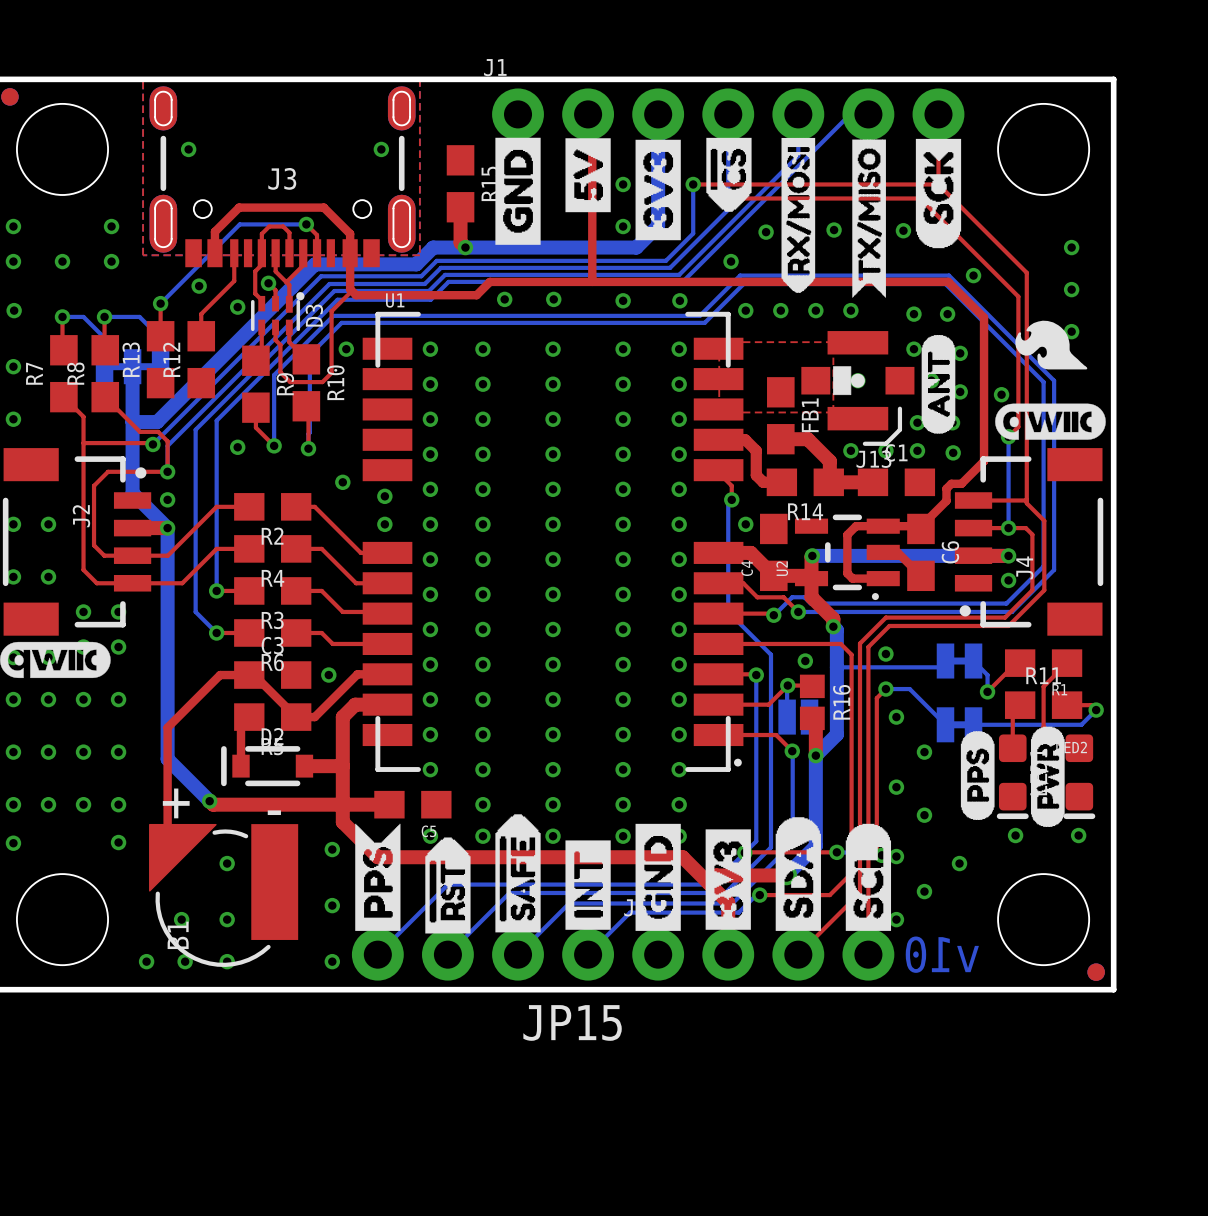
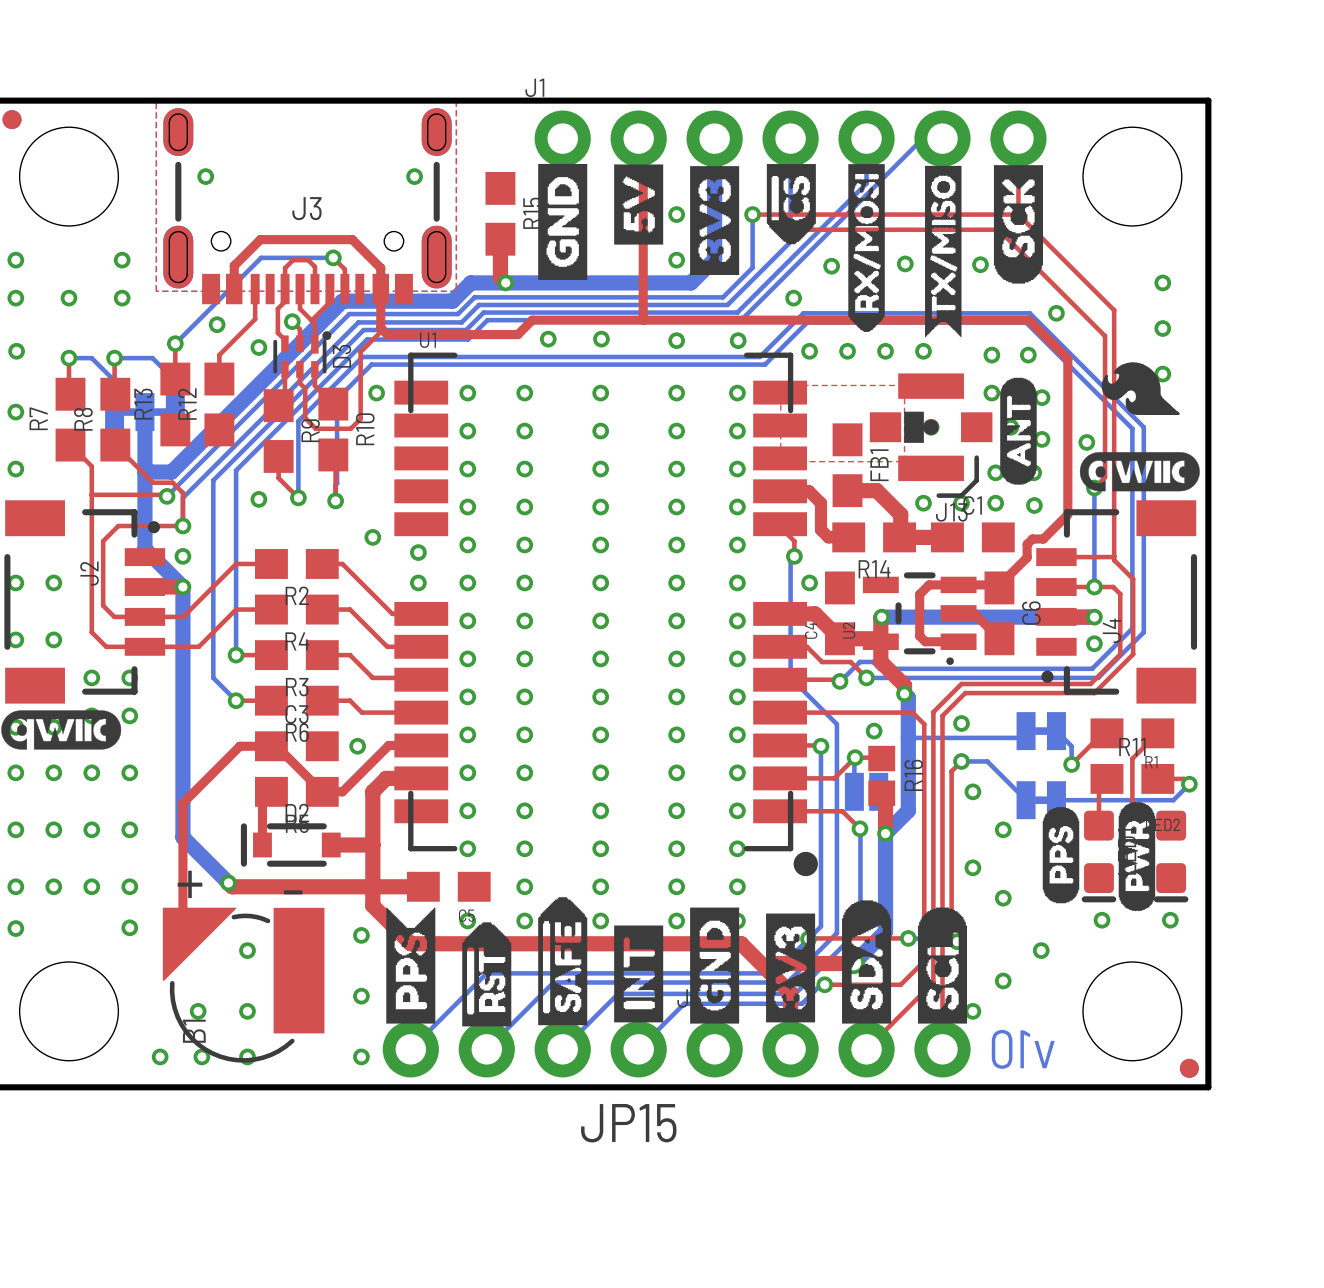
U1 footprint: [362, 311, 744, 772] -> [394, 352, 818, 877]
via: (896, 856) -> none

